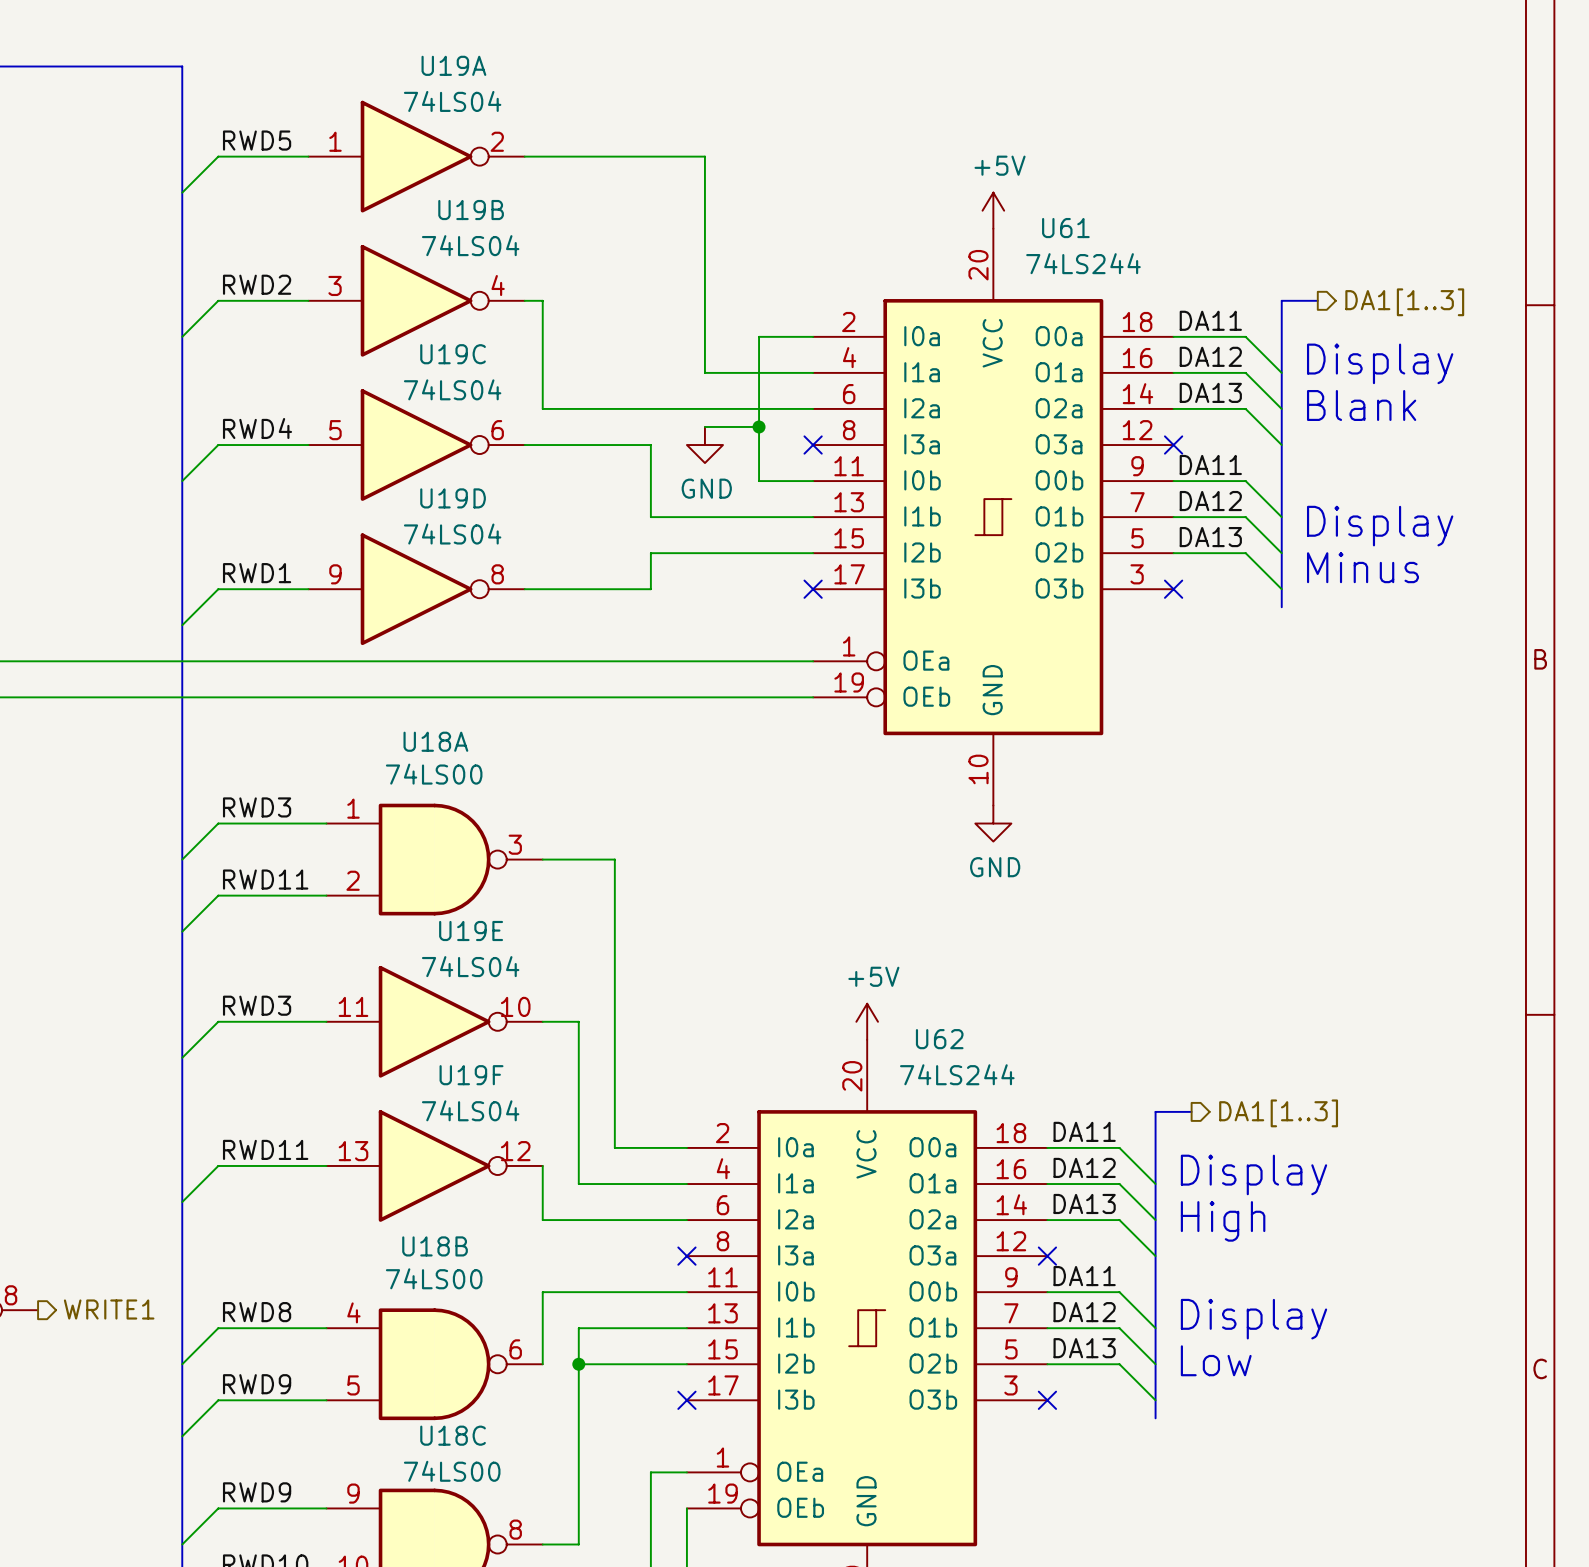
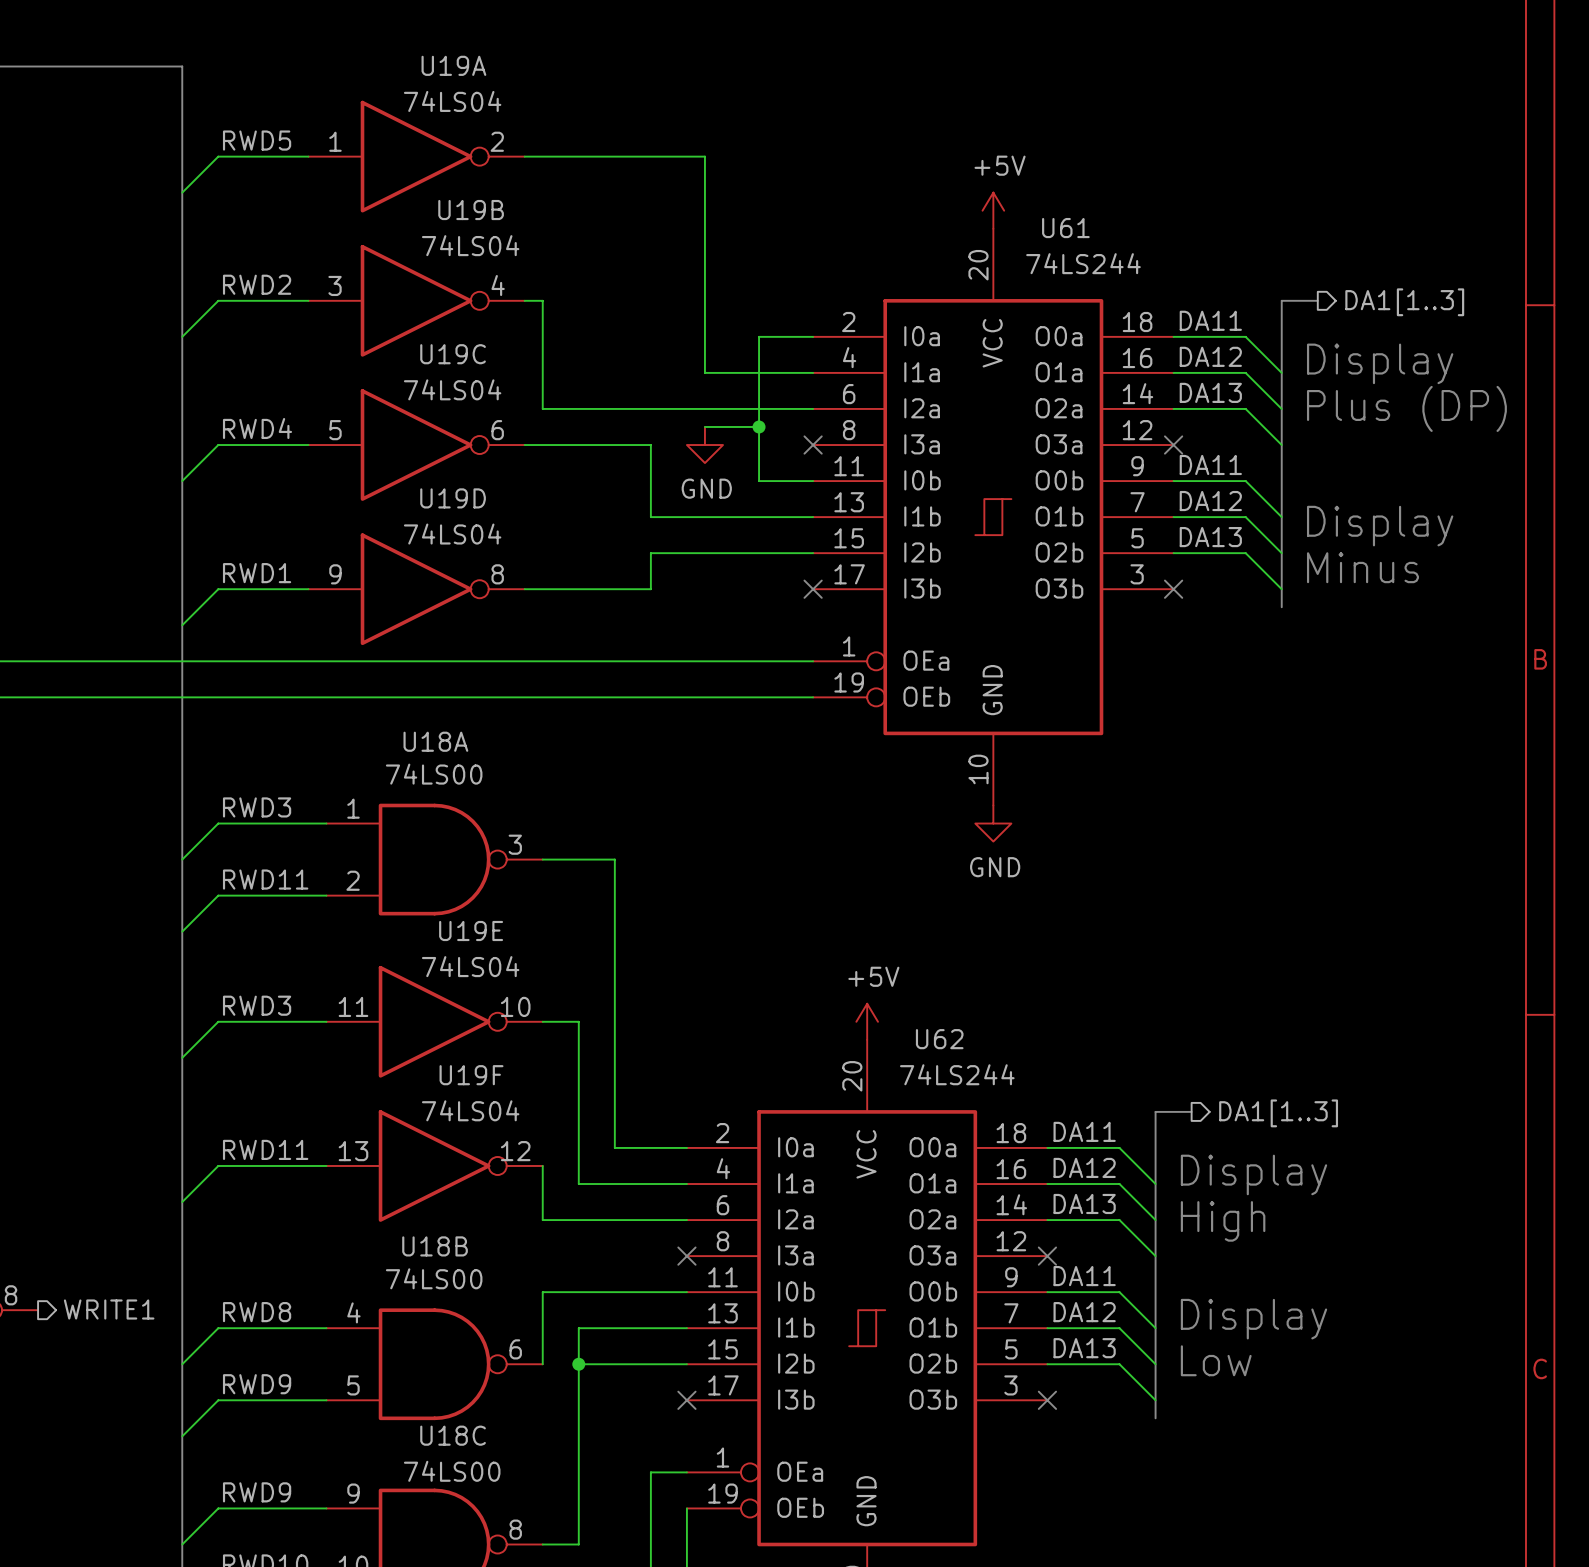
text: Blank (1361, 405) -> Plus (DP) (1406, 408)

